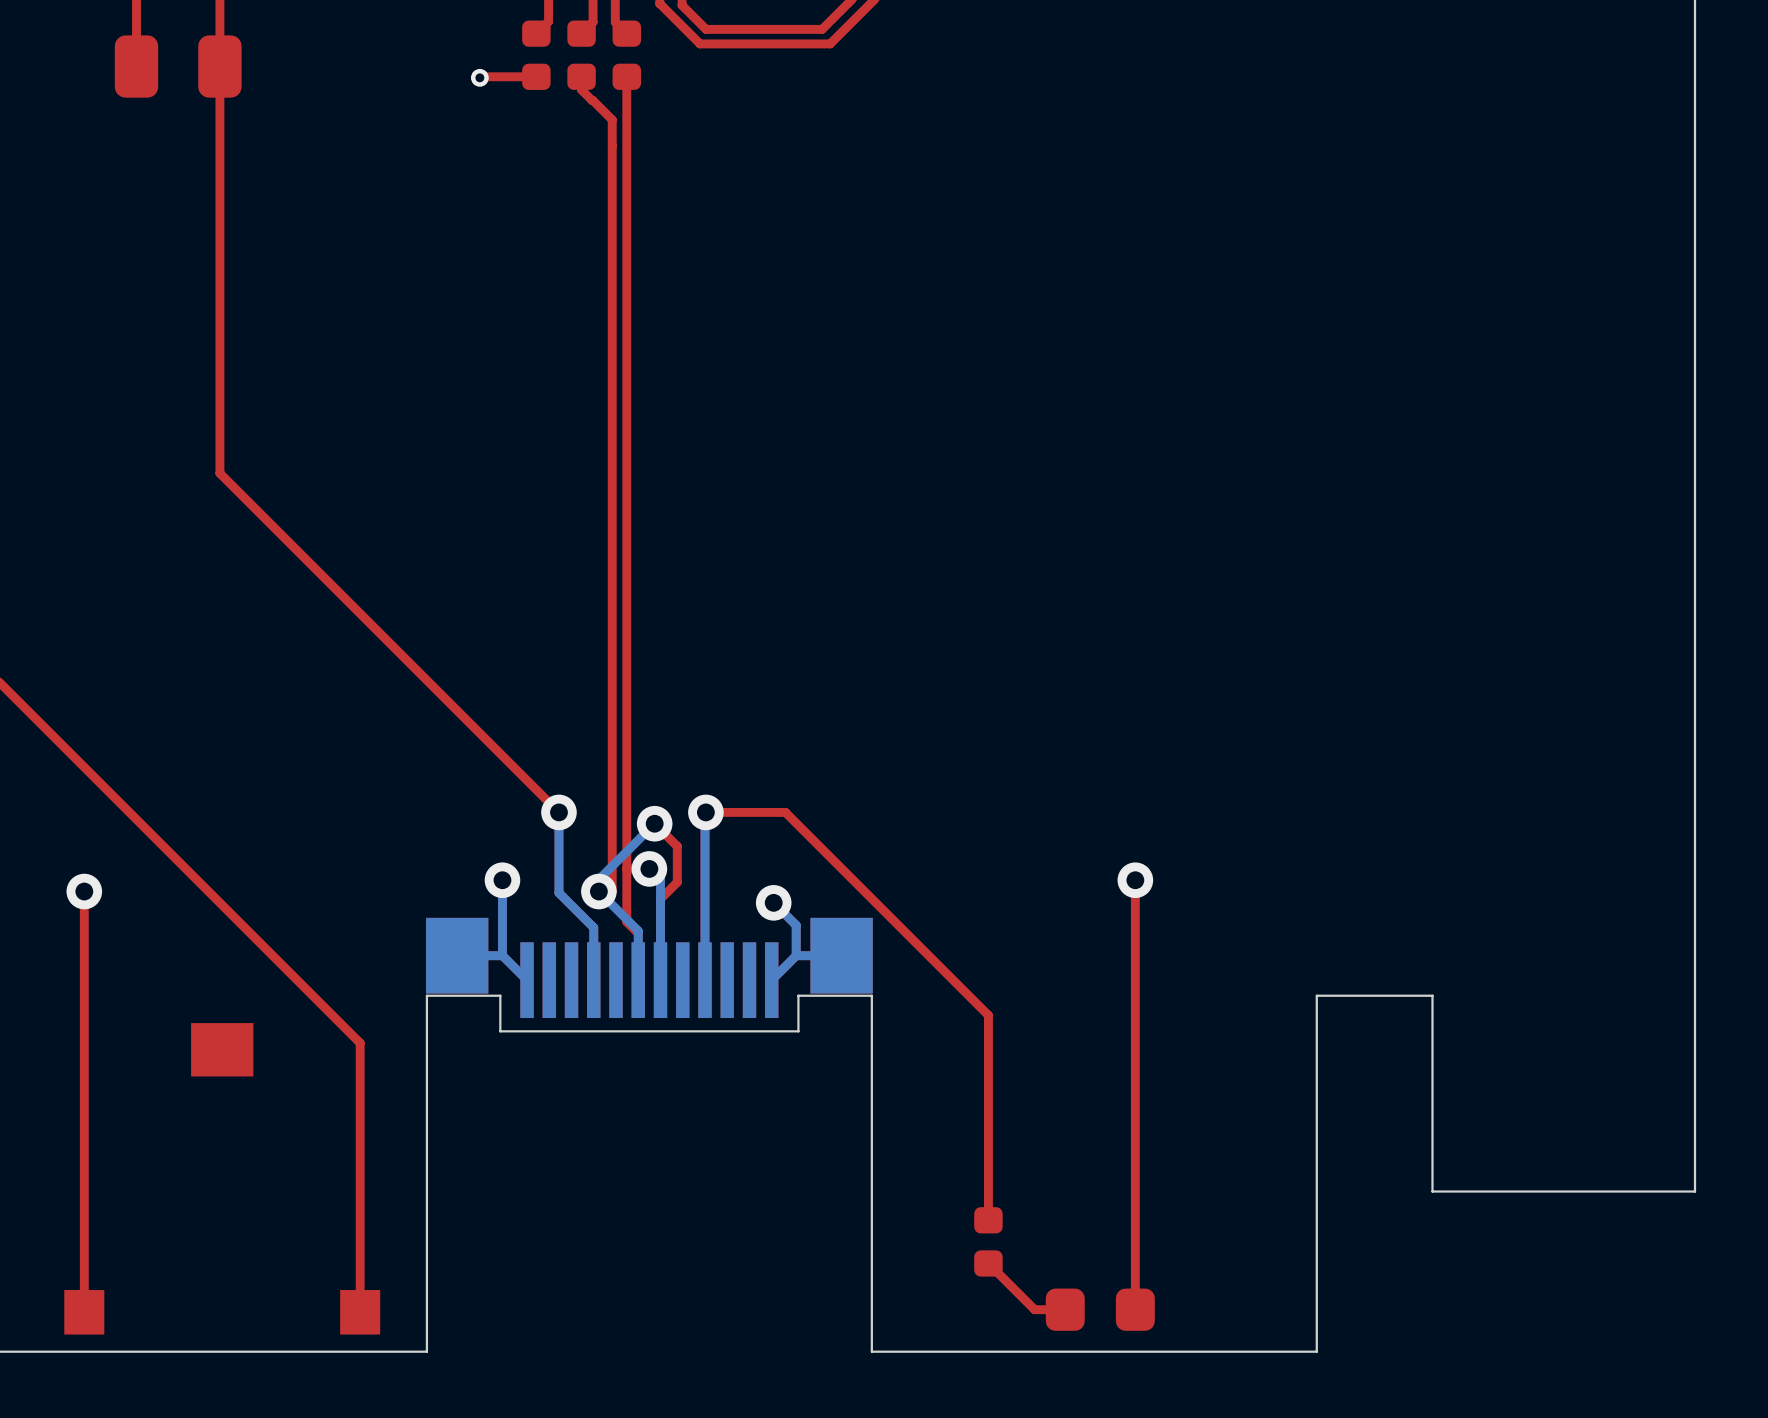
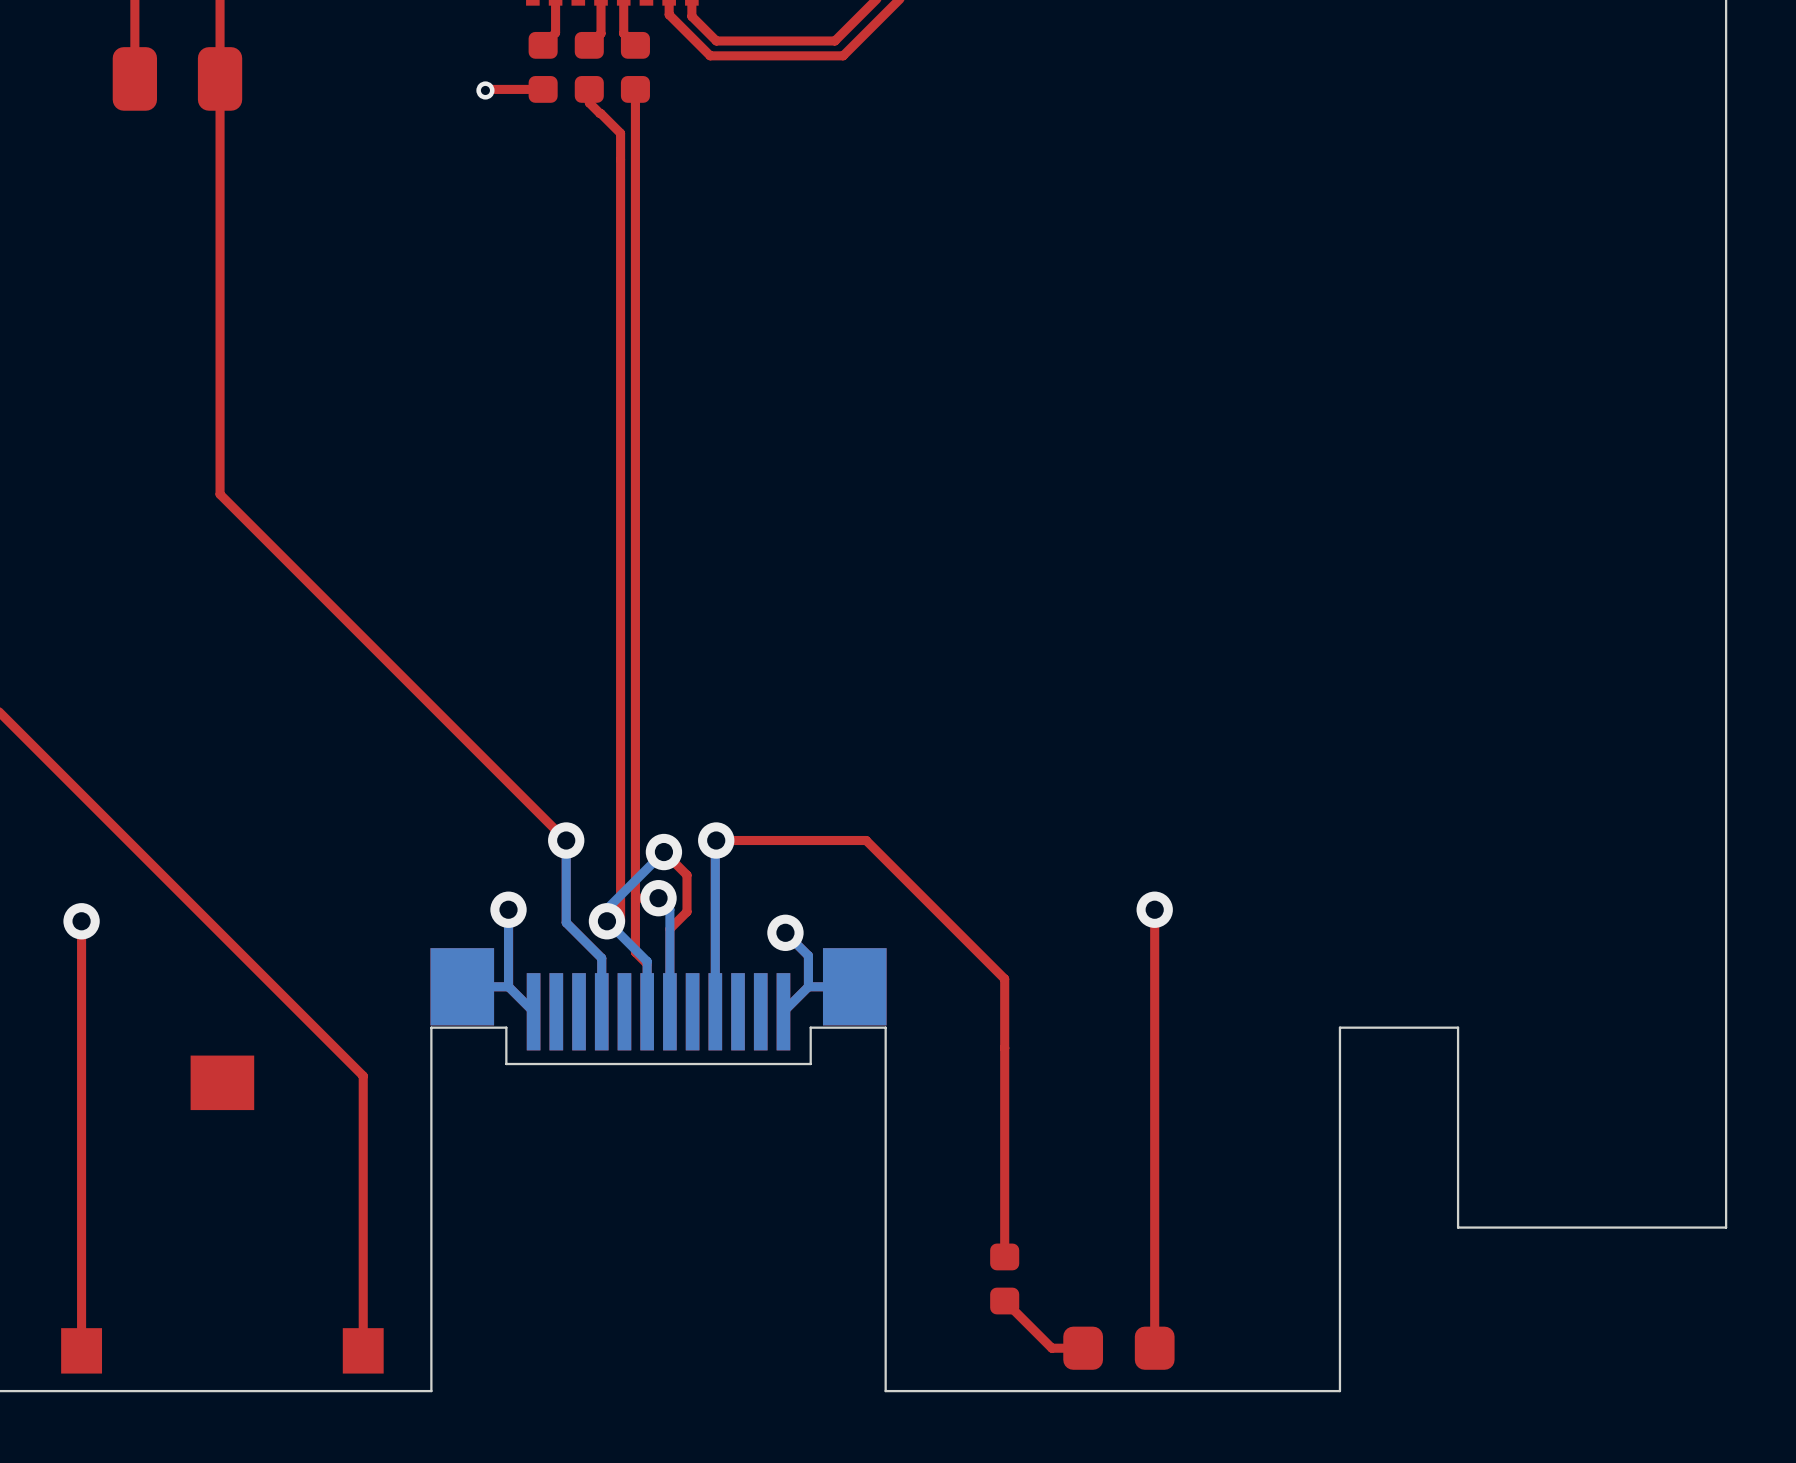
top track: (785, 812) (988, 1015) -> (797, 840) (866, 840) (1004, 978) (1004, 1047)

